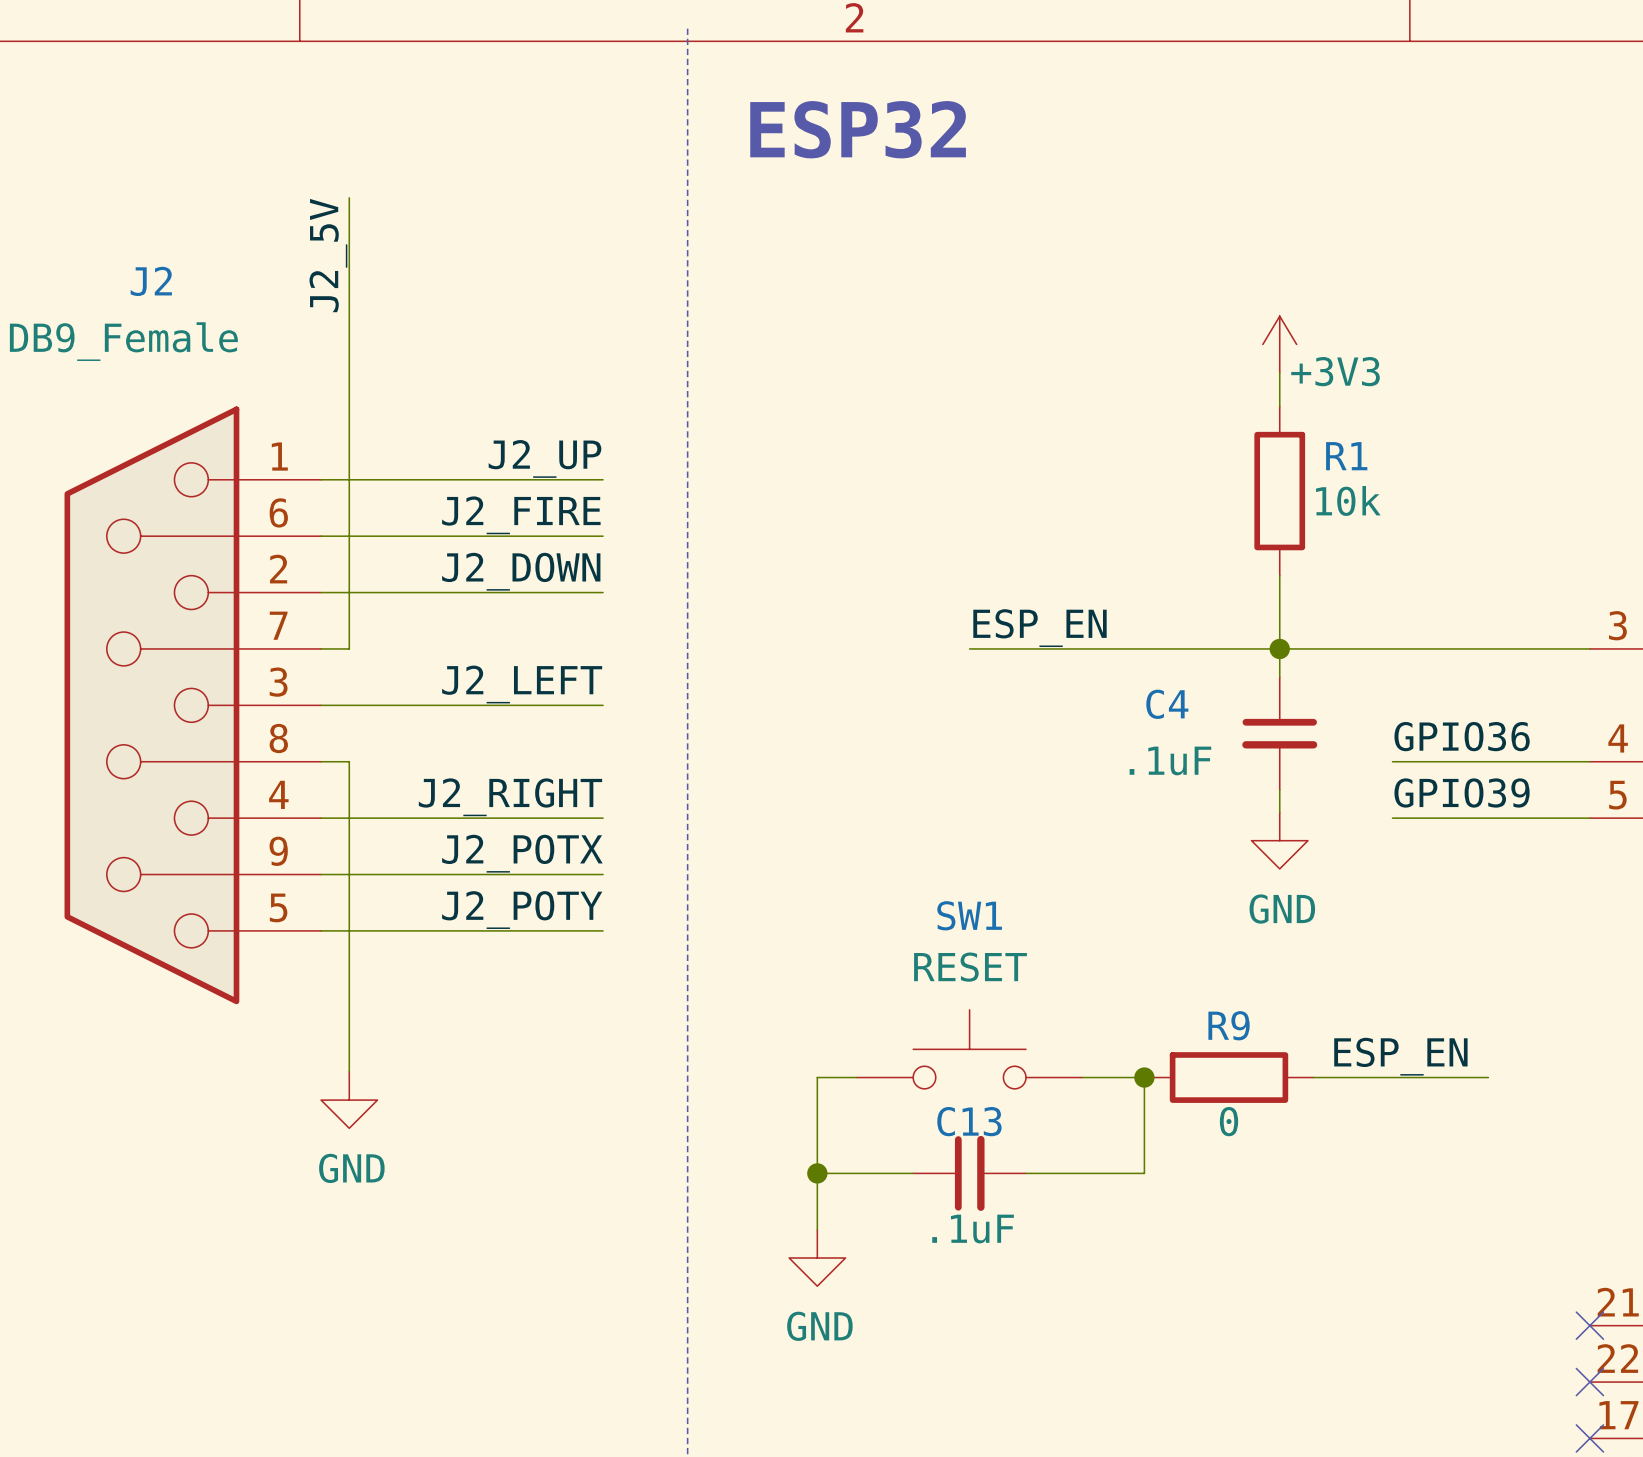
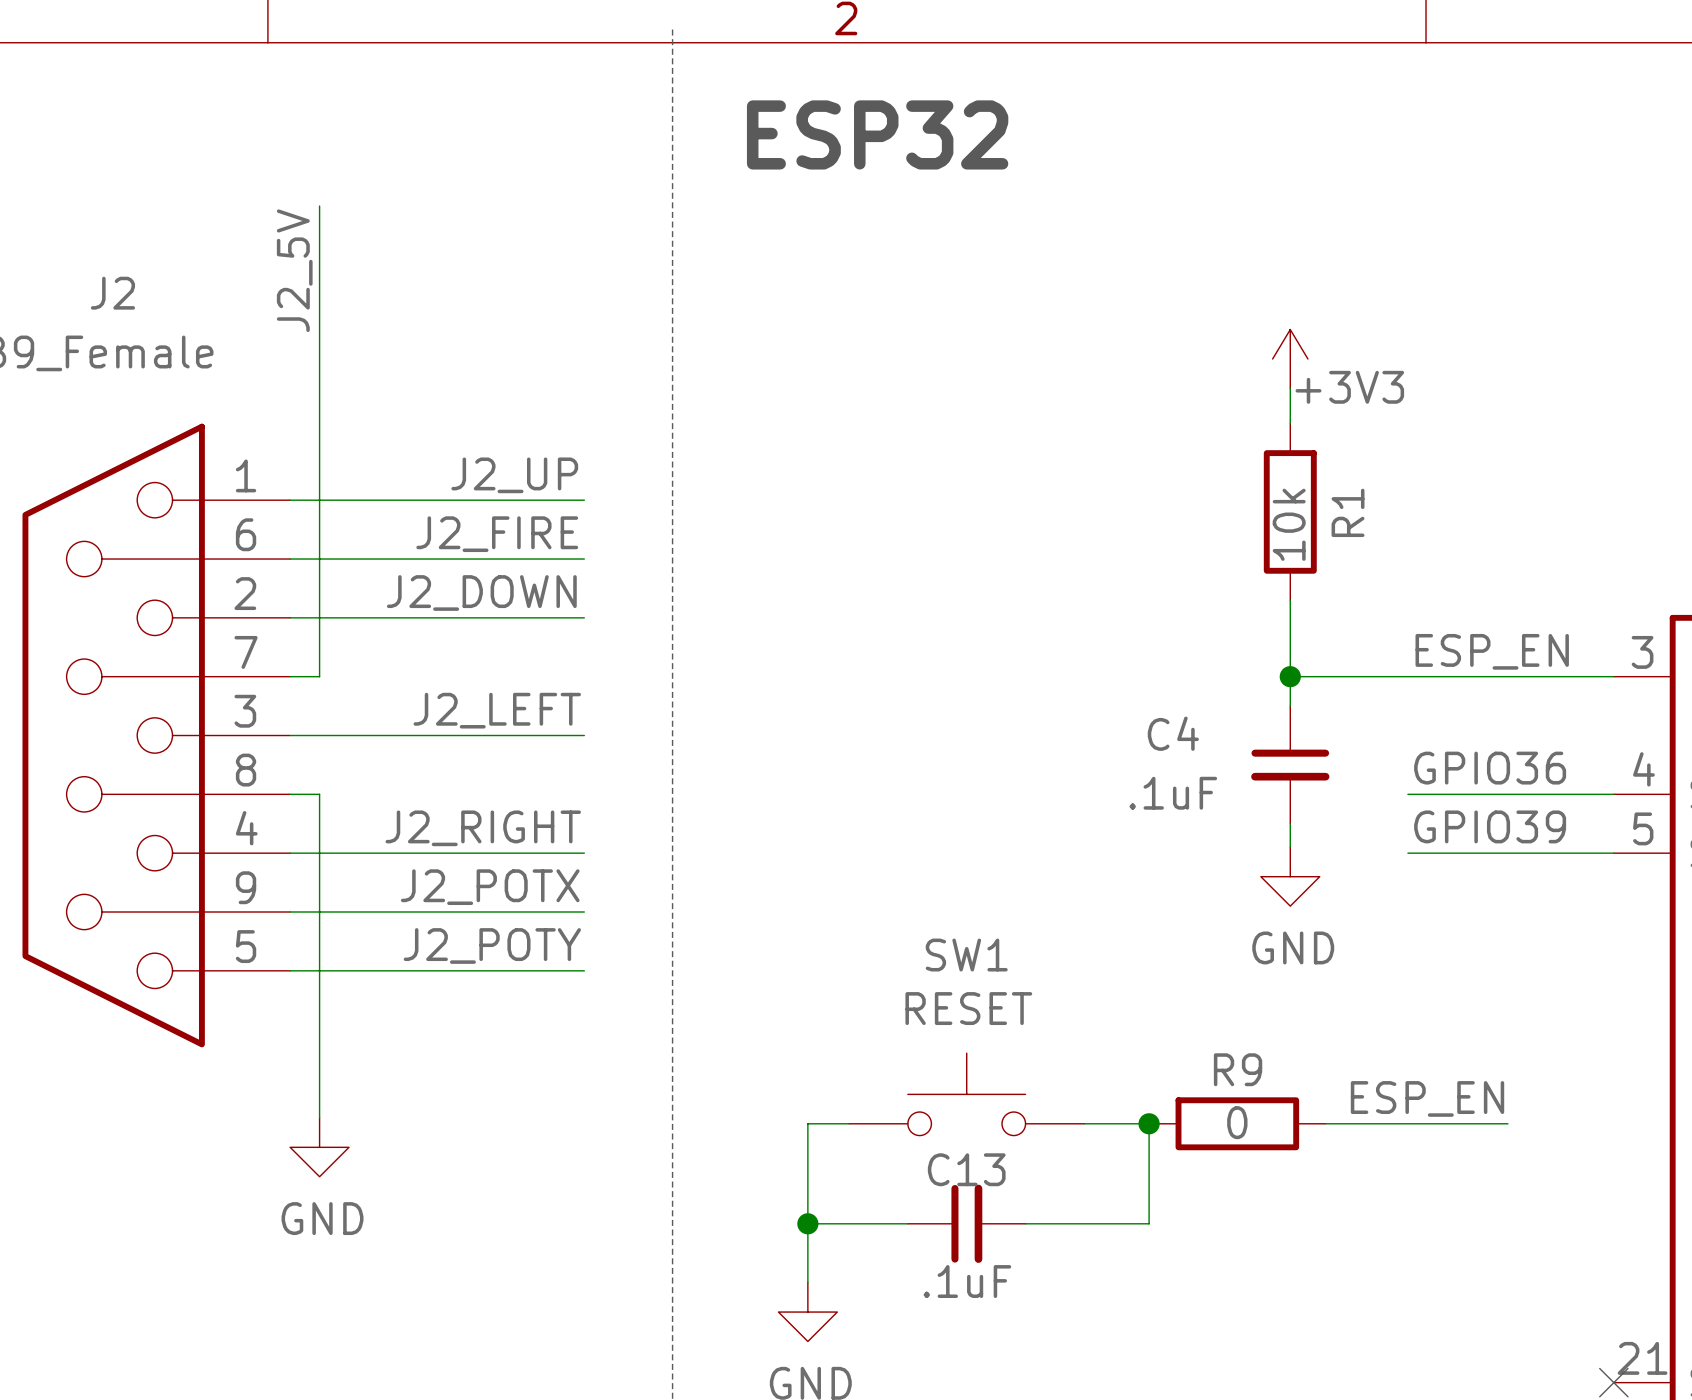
R1 name rotation: 0° (1346, 456) -> 90° counterclockwise (1348, 512)
R1 value rotation: 0° (1348, 500) -> 90° counterclockwise (1289, 524)
label position: ESP_EN (1039, 628) -> ESP_EN (1492, 651)
wire: (969, 648) (1279, 648) -> none
R9 value position: 0 (1228, 1121) -> 0 (1237, 1122)

